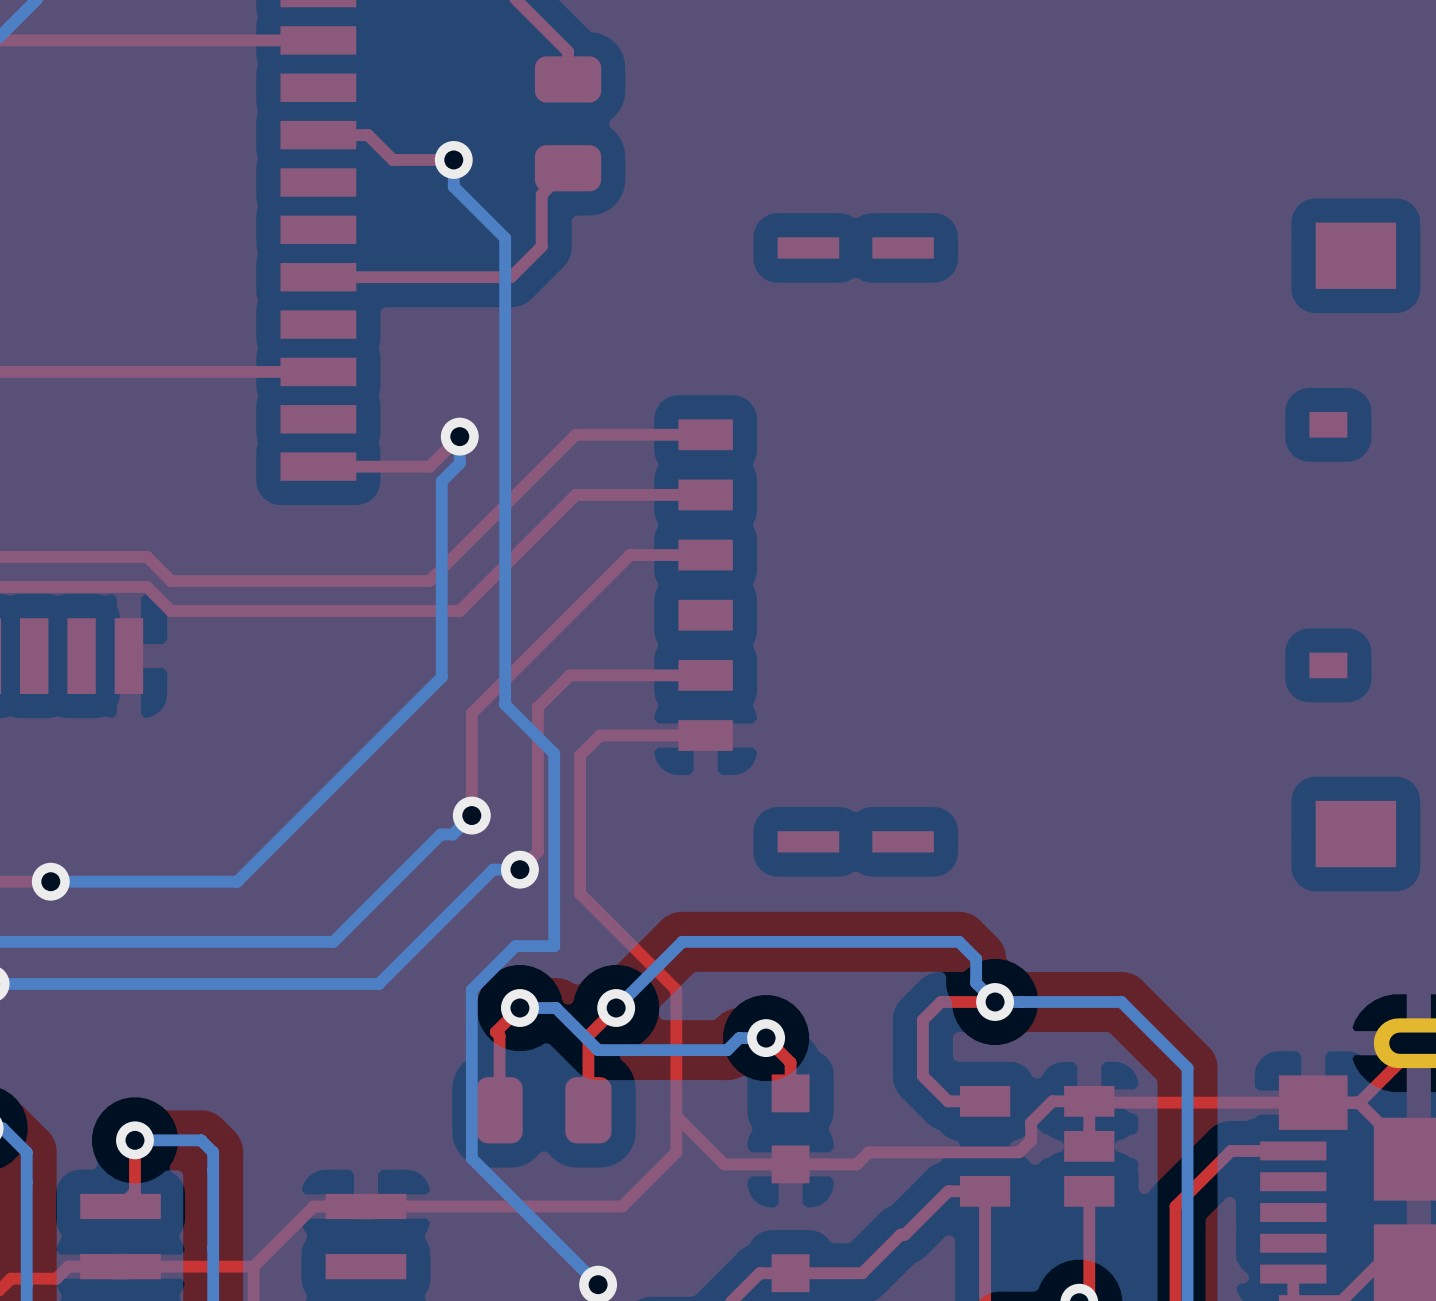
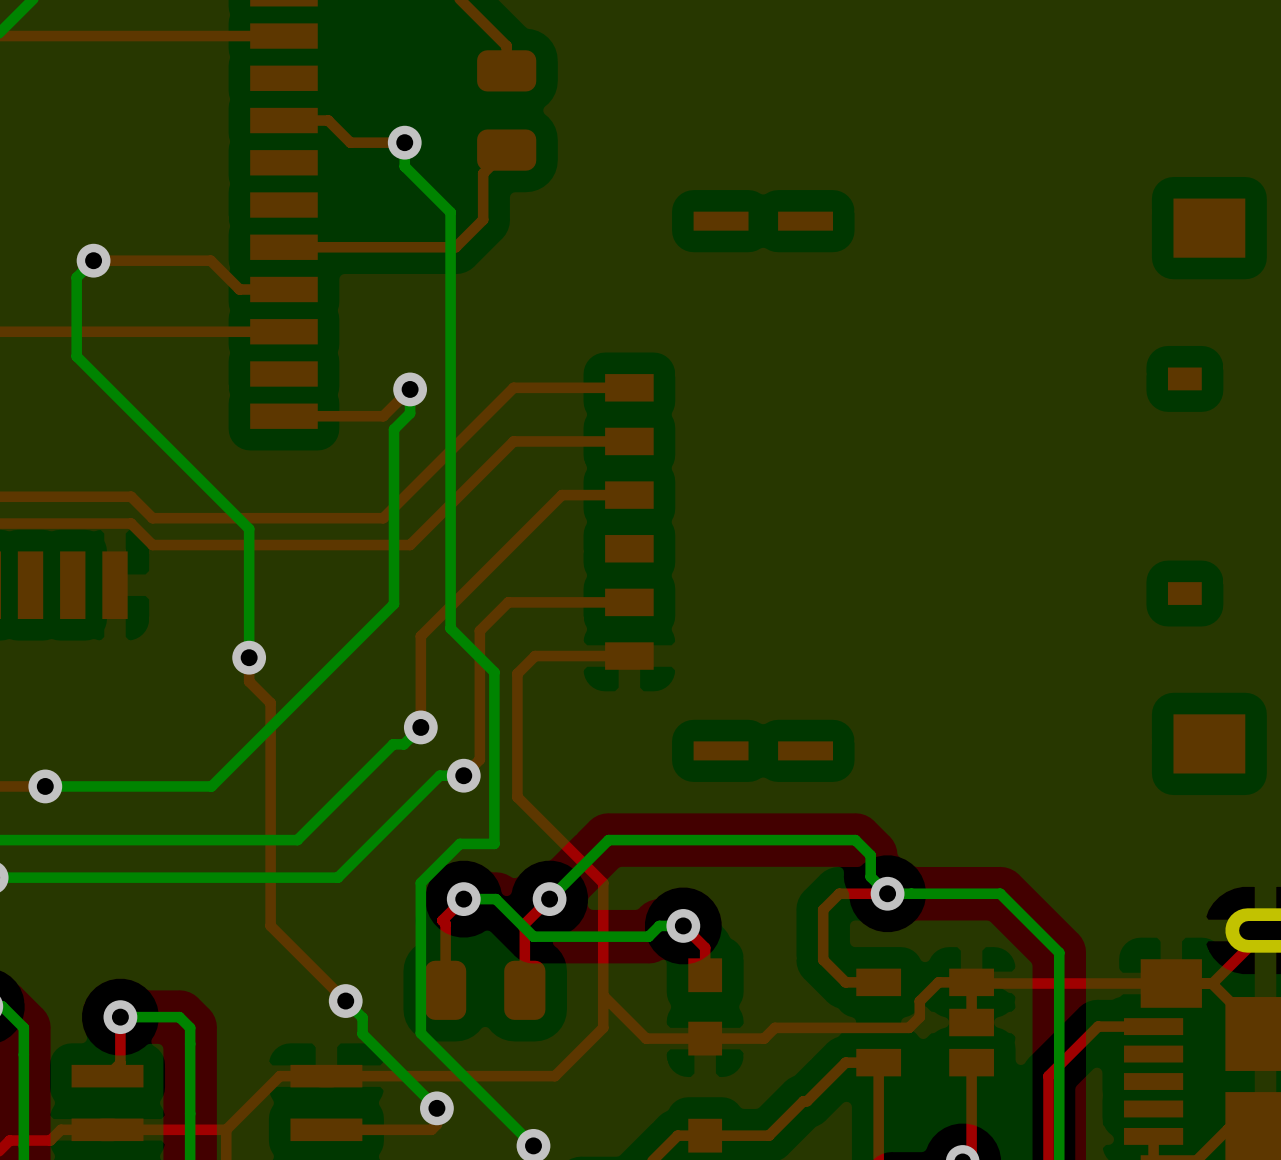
top track: none -> (93, 260) (210, 260) (239, 289) (283, 289)
bottom track: none -> (93, 260) (76, 277) (76, 356) (249, 528) (249, 657)
via: none -> (93, 260)
top track: none -> (249, 657) (249, 681) (270, 703) (270, 925) (345, 1001)
via: none -> (249, 657)
bottom track: none -> (345, 1001) (362, 1017) (362, 1034) (436, 1108)
via: none -> (345, 1001)
top track: none -> (436, 1108) (436, 1124) (431, 1129) (326, 1129)
via: none -> (436, 1108)

